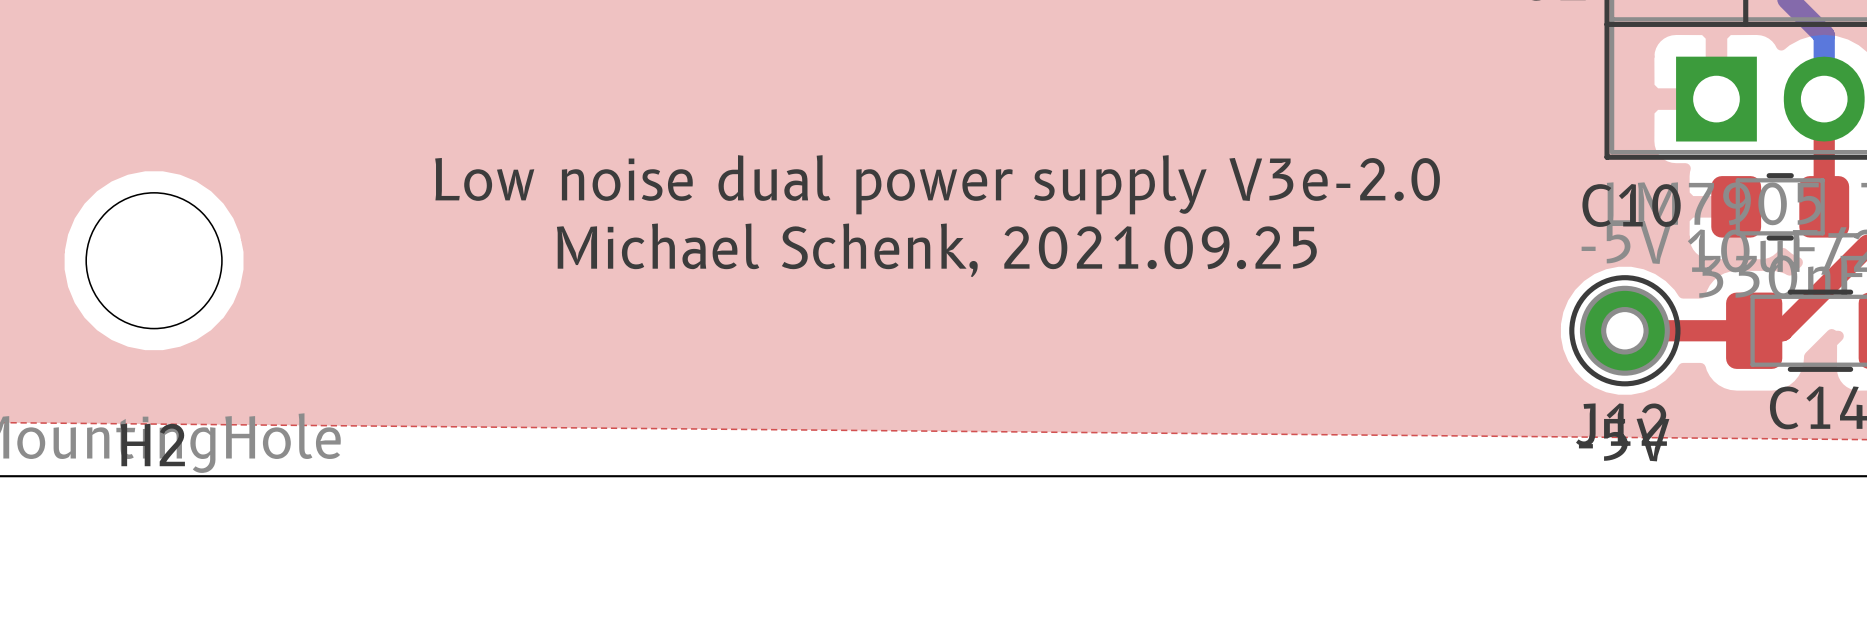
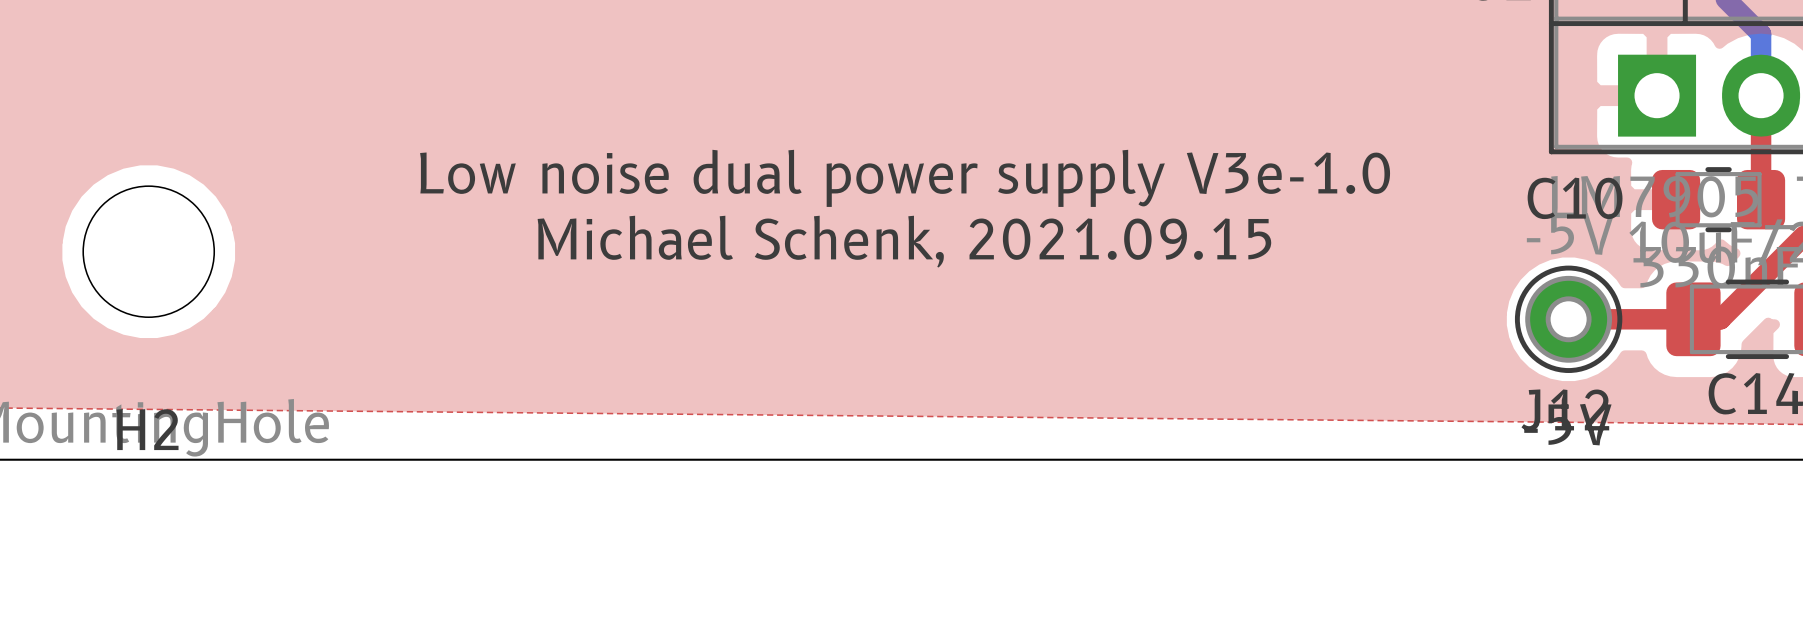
text: Low noise dual power supply V3e-2.0 (937, 184) -> Low noise dual power supply V3e-1.0 (905, 178)
text: Michael Schenk, 2021.09.25 (936, 250) -> Michael Schenk, 2021.09.15 (904, 241)

